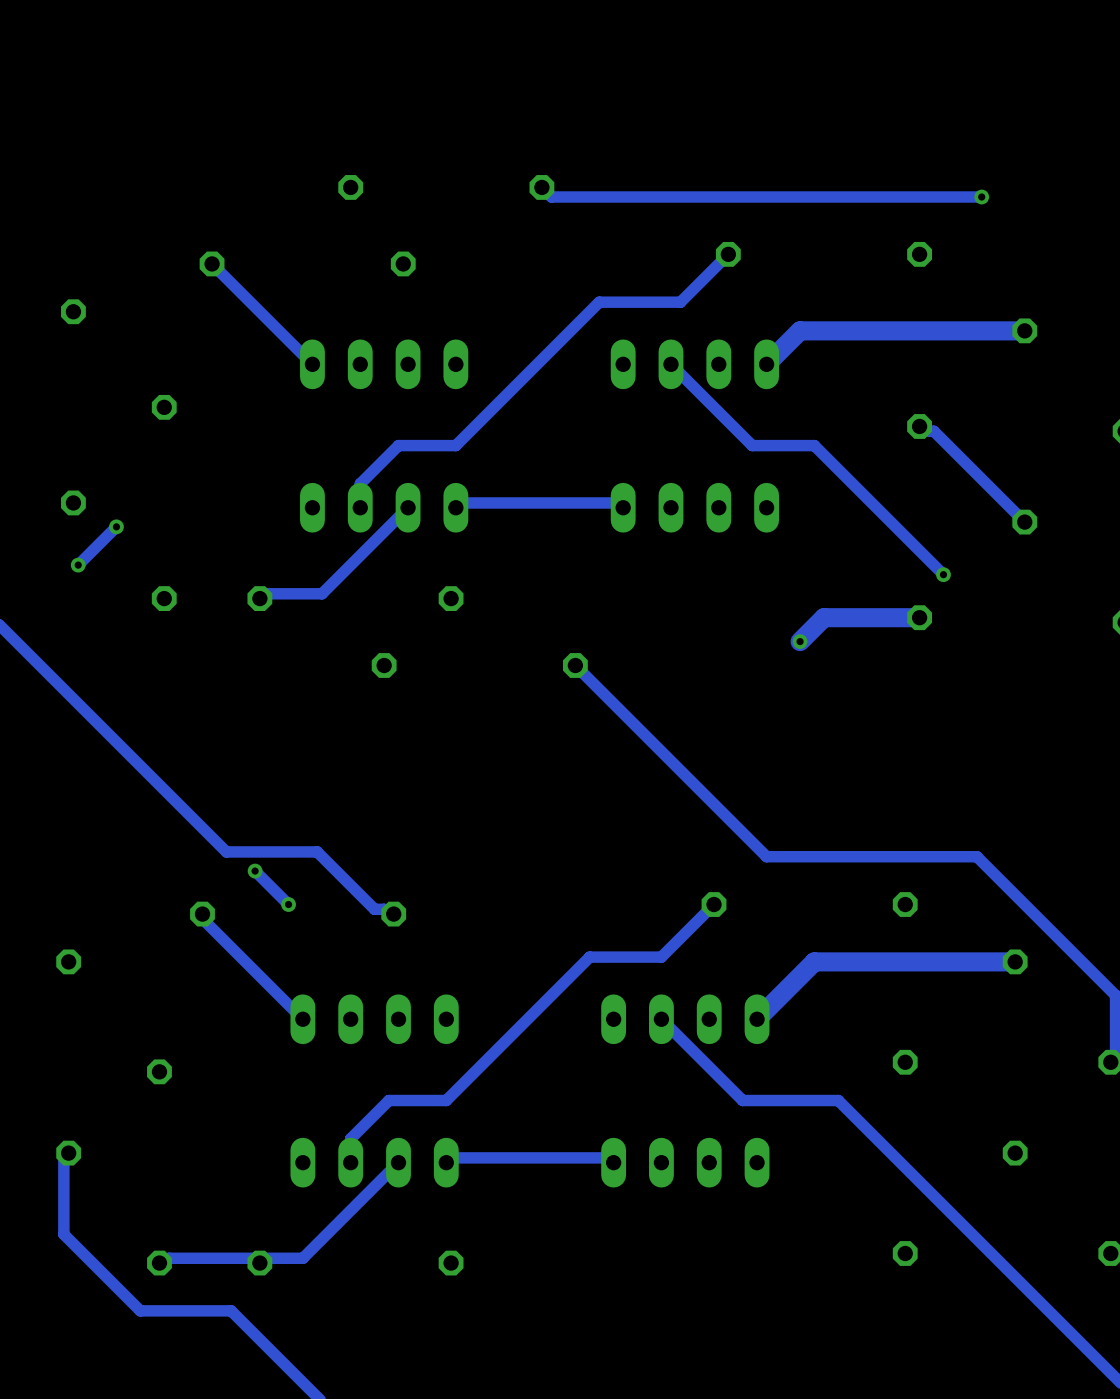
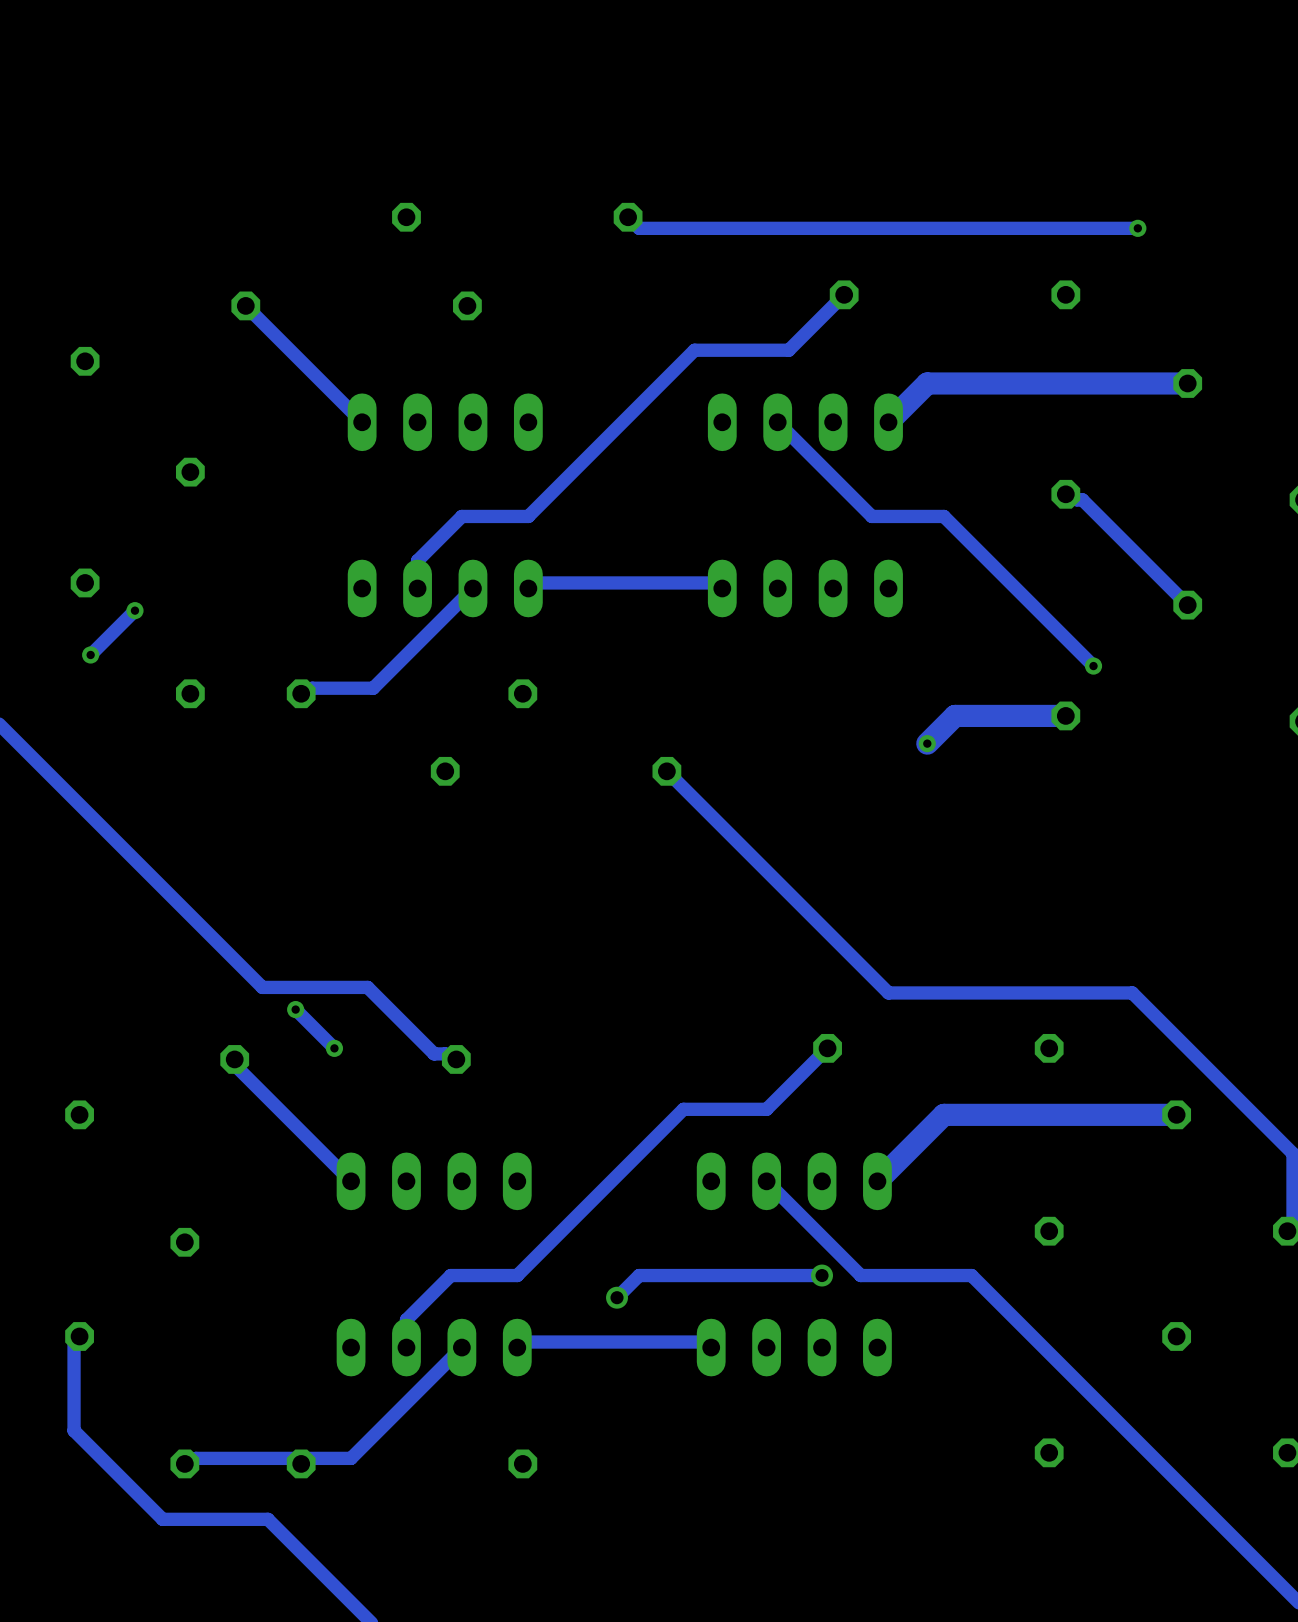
track: none -> (822, 1275) (639, 1275) (617, 1297)
via: none -> (822, 1275)
via: none -> (617, 1297)

